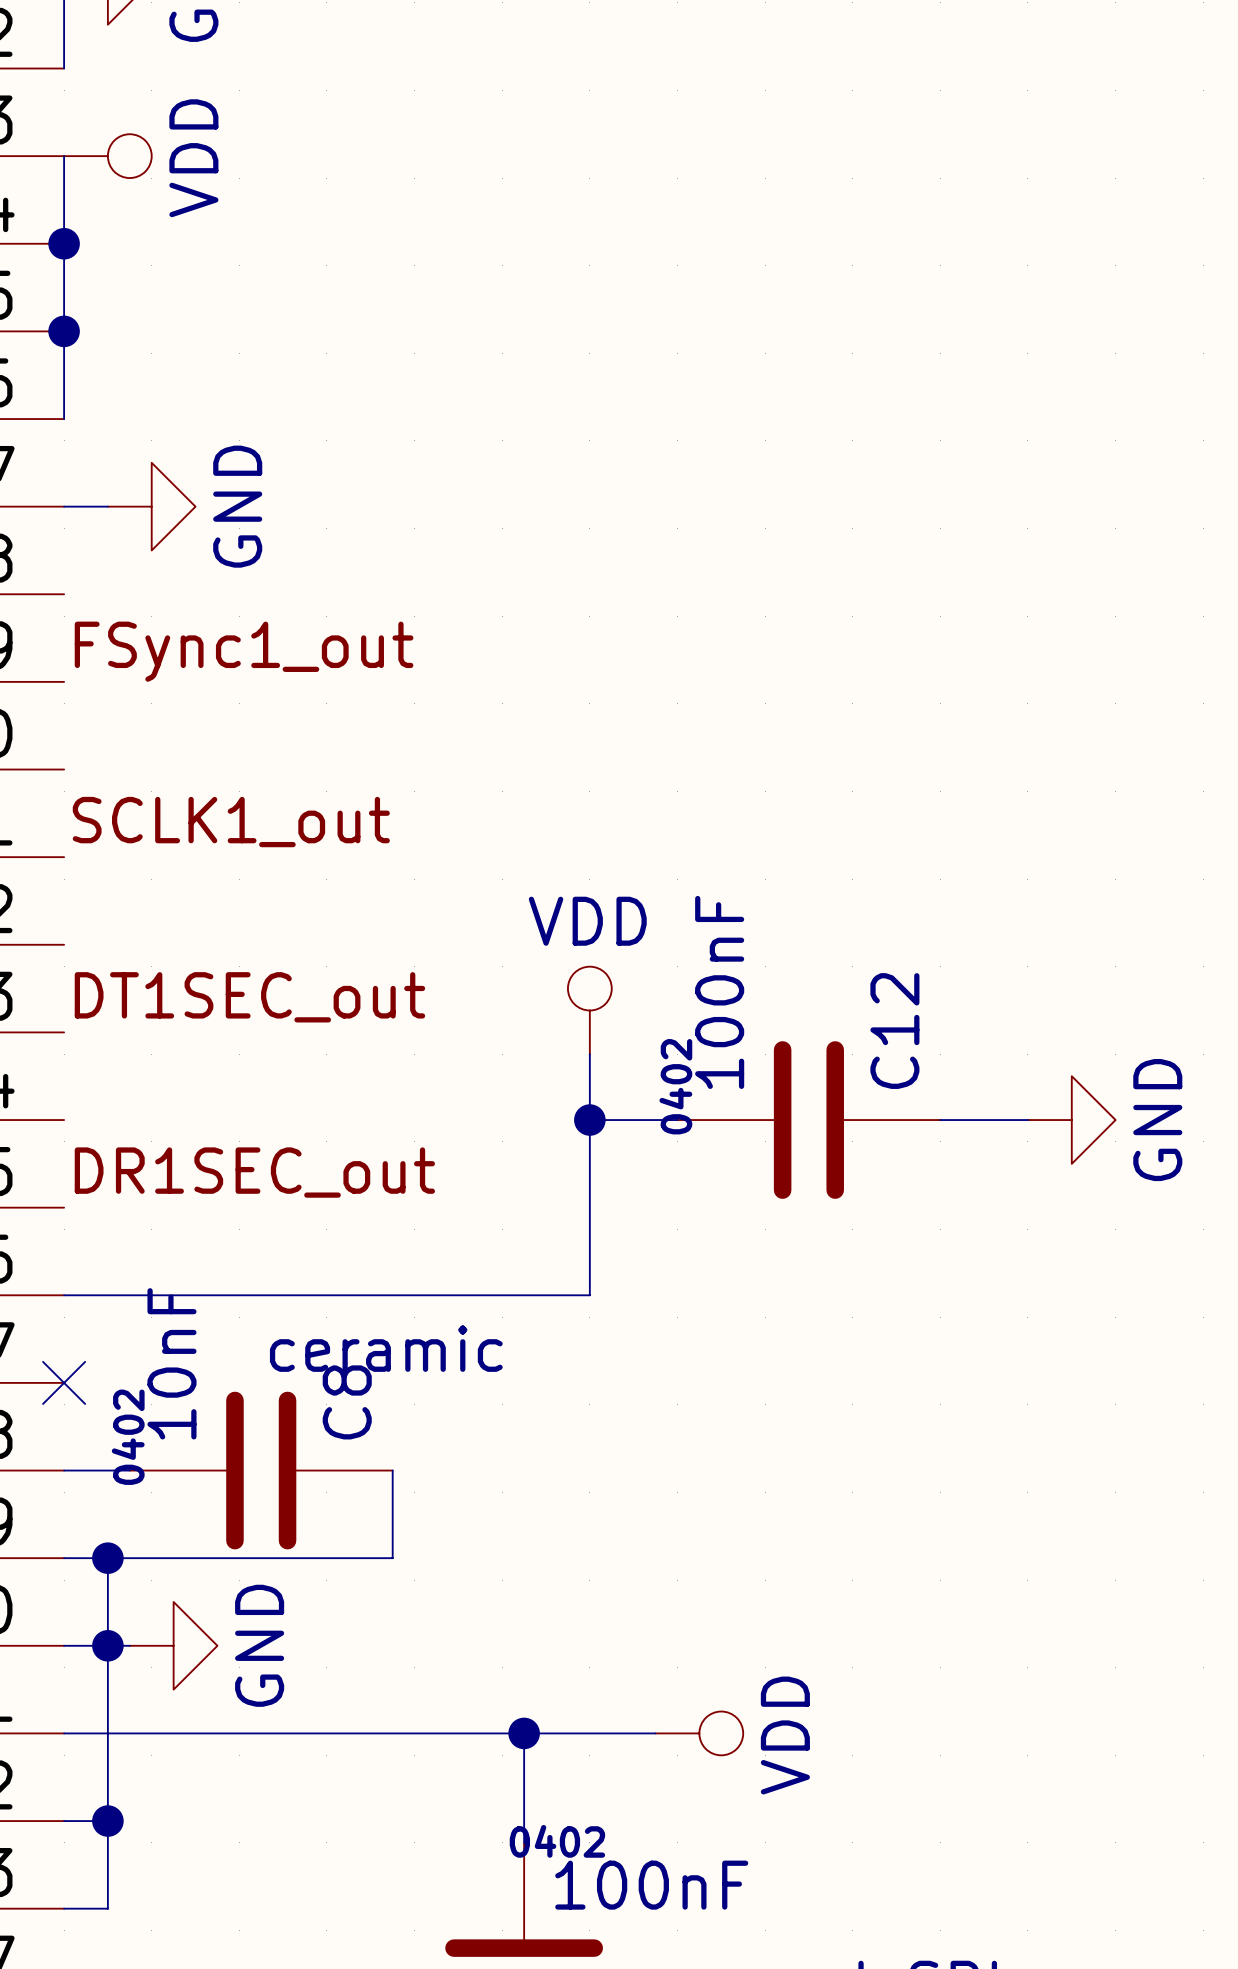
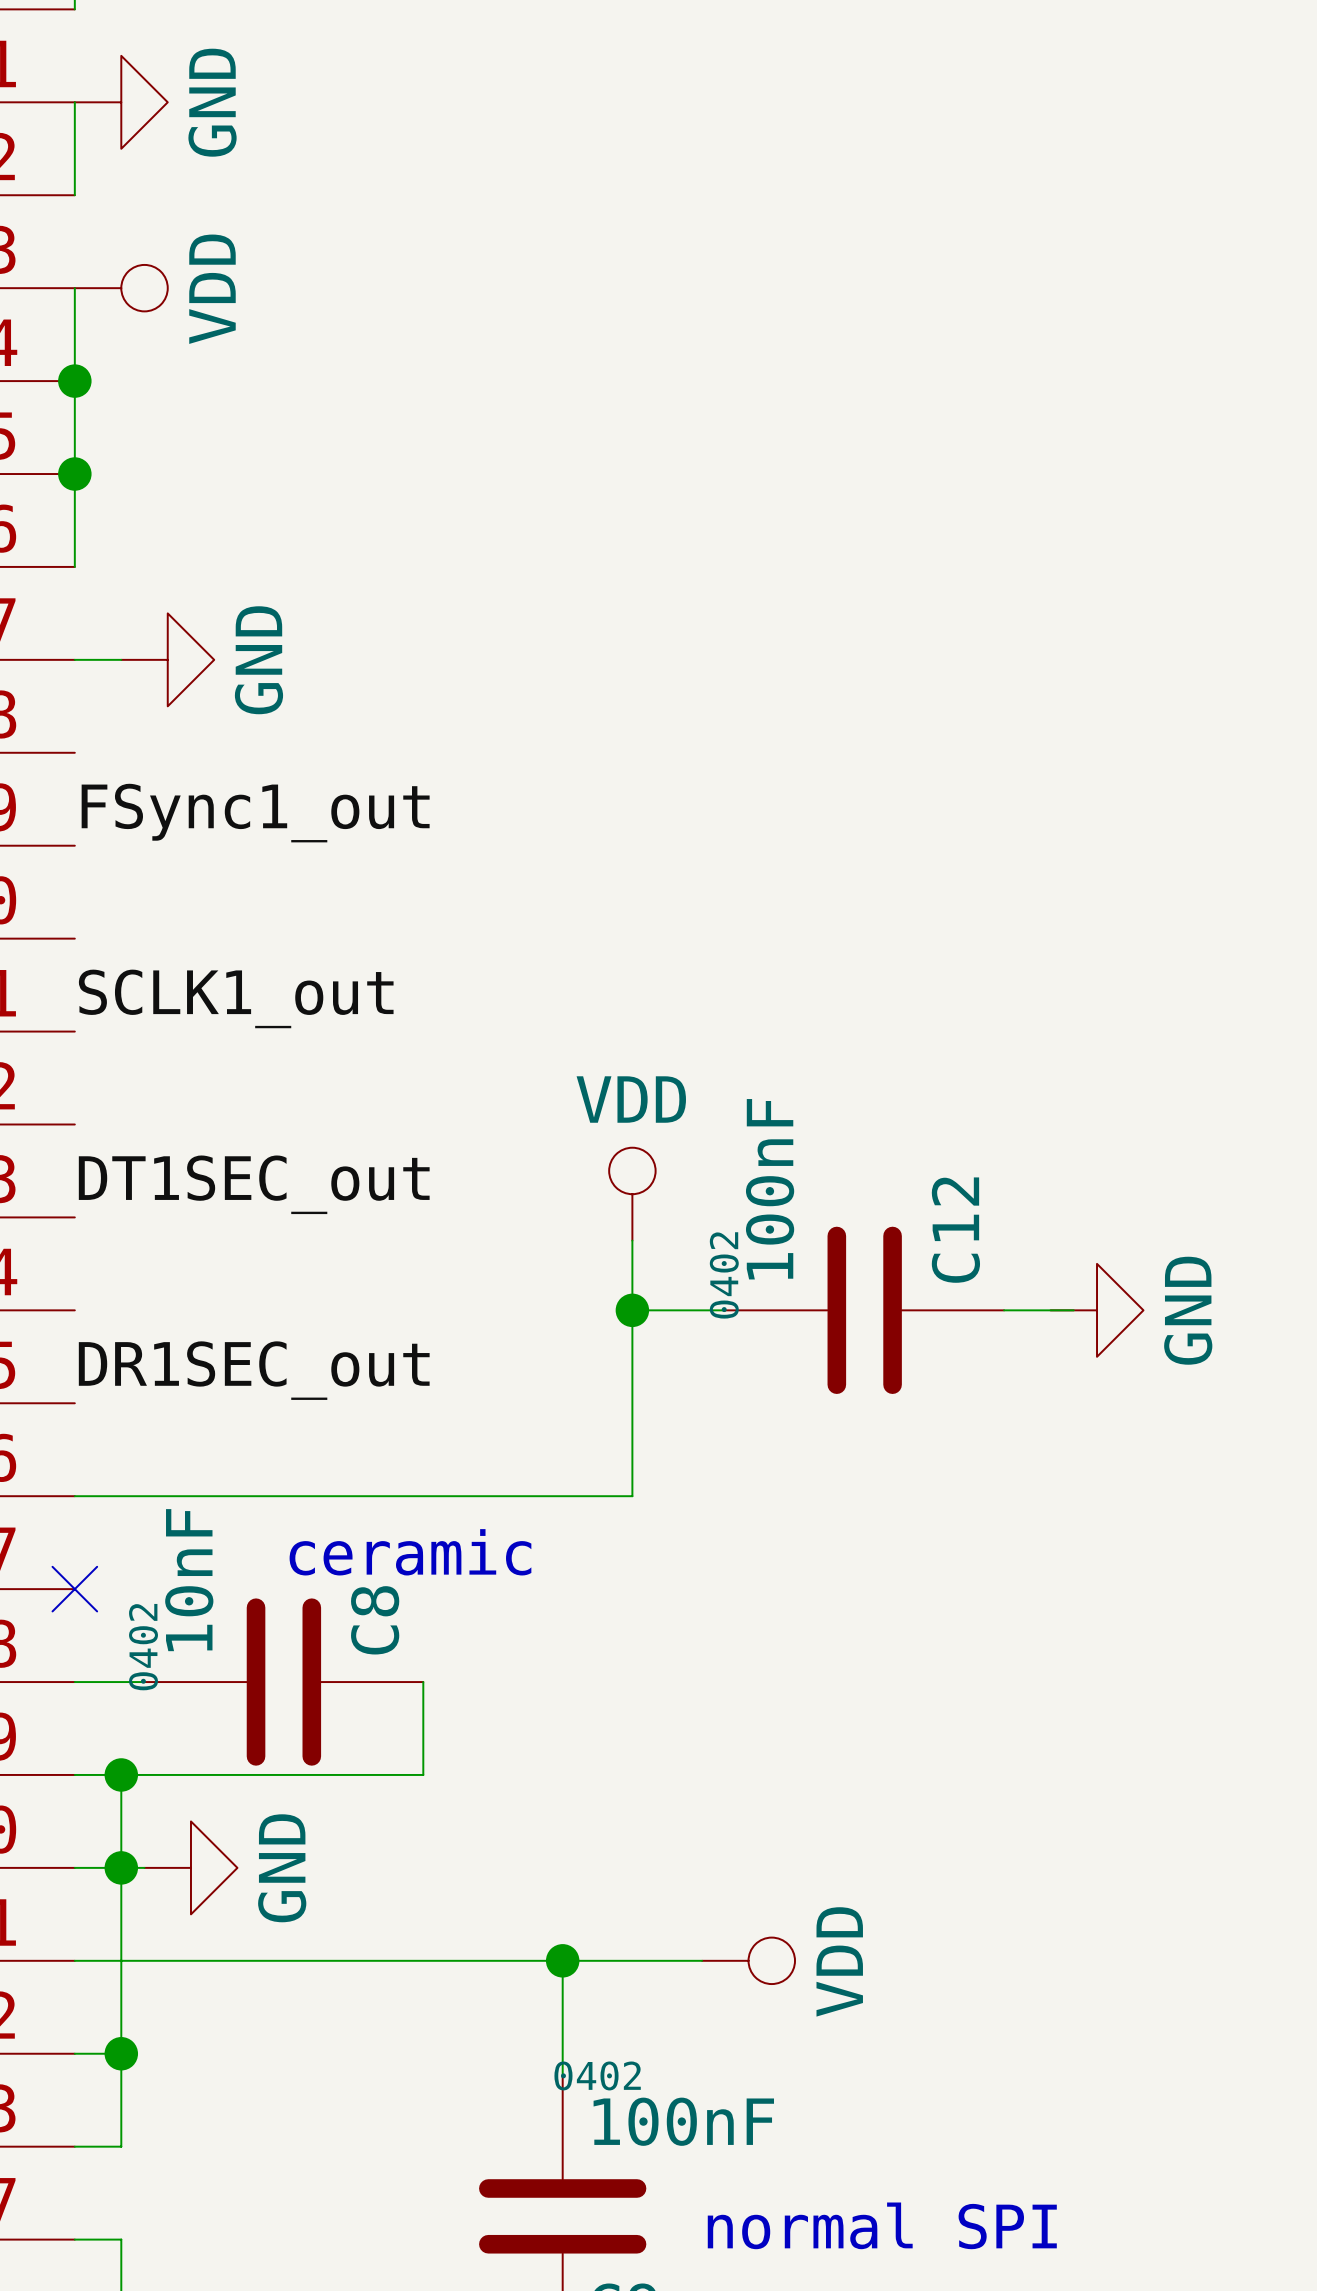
power symbol position: GND (1071, 1120) -> GND (1097, 1310)

